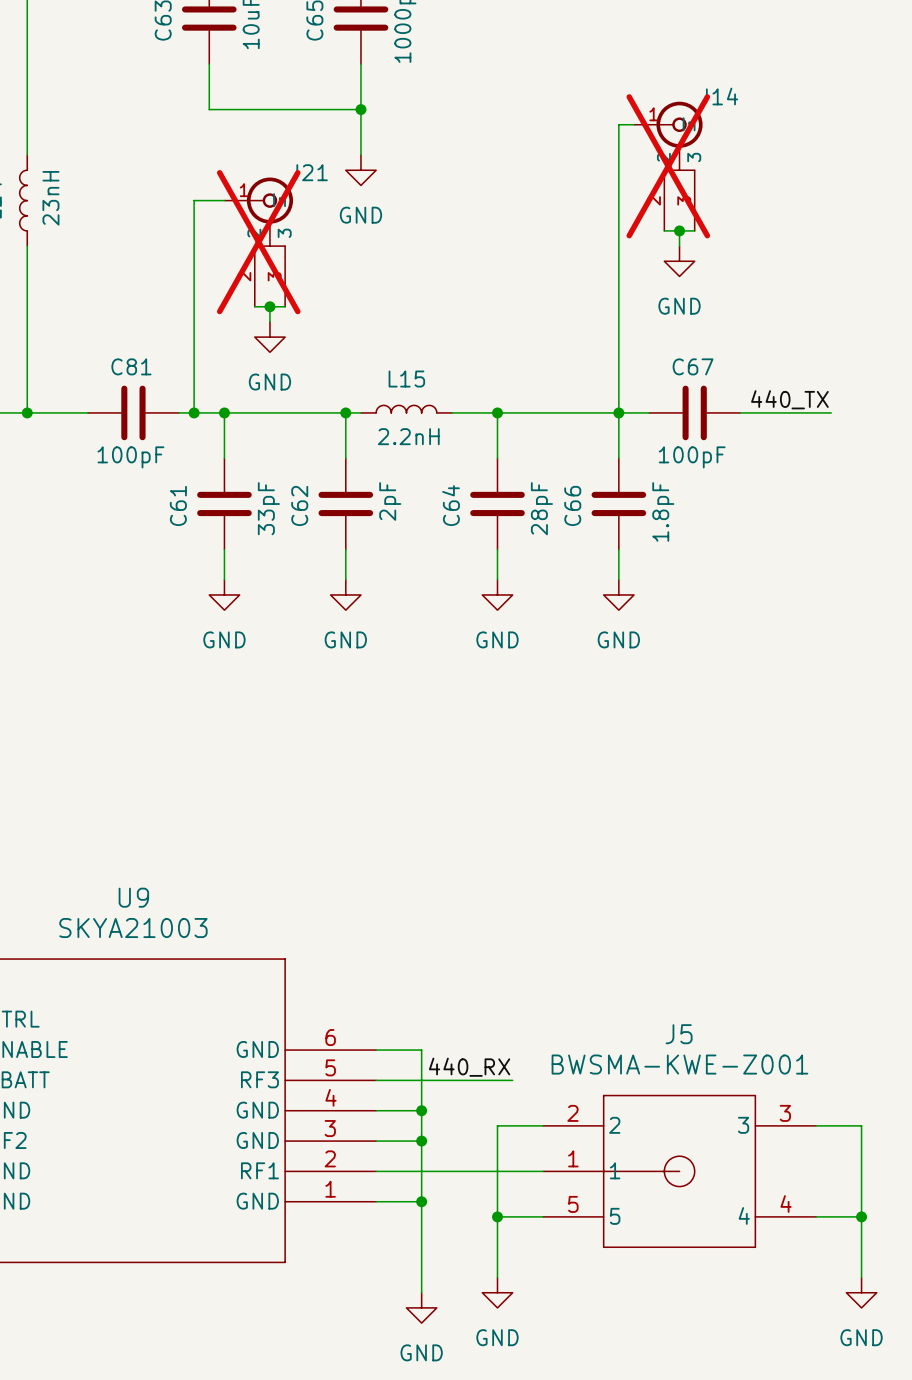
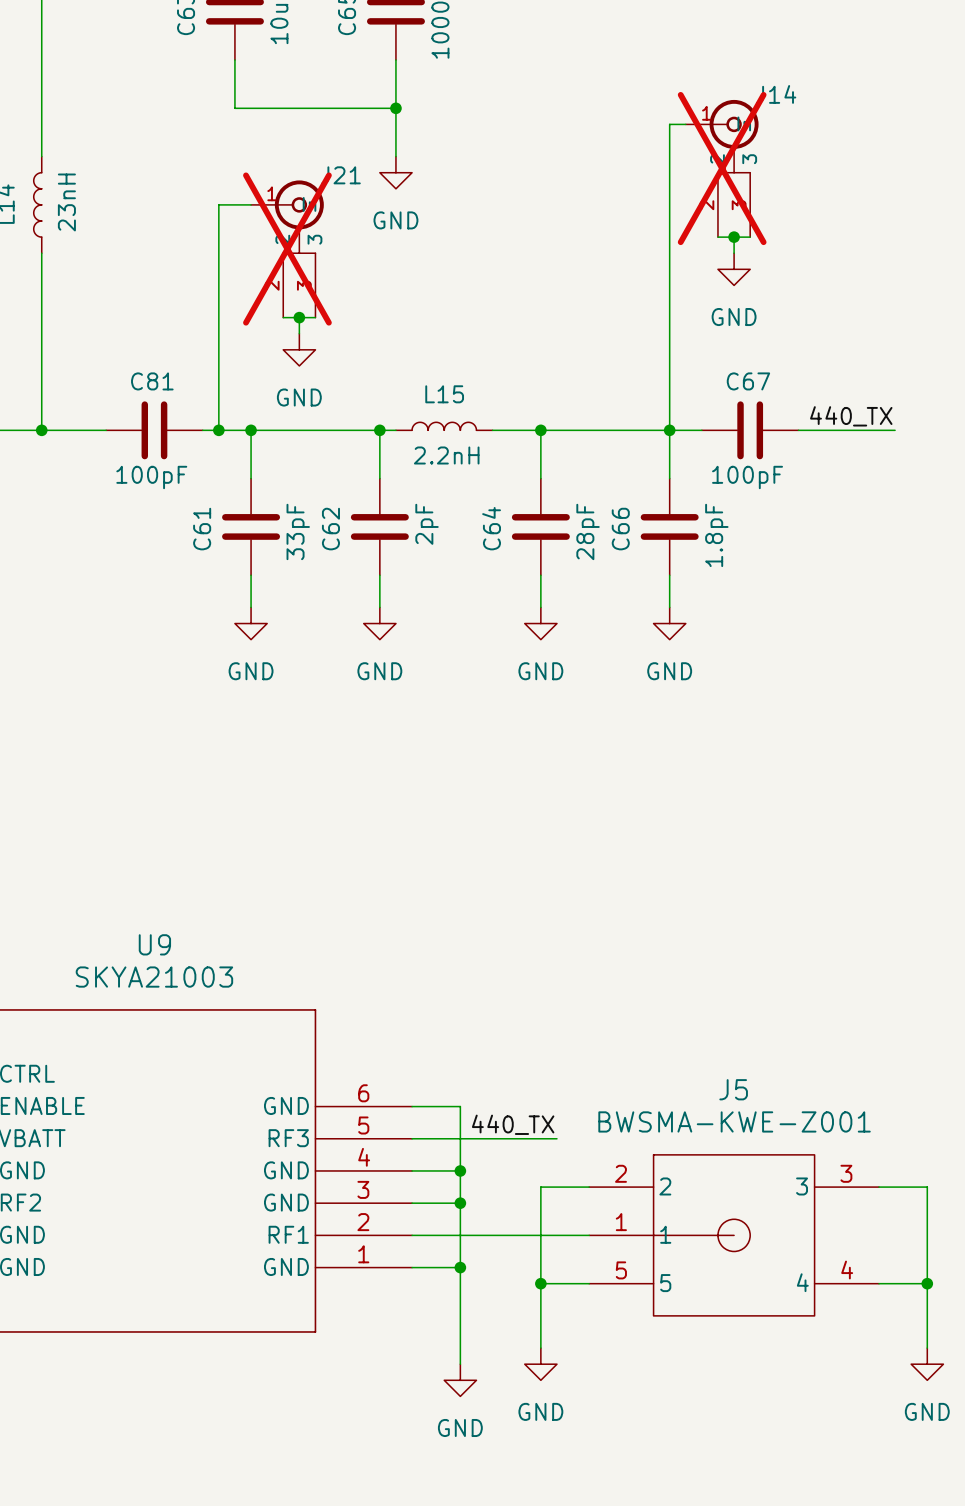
label: 440_RX (469, 1067) -> 440_TX (513, 1124)

